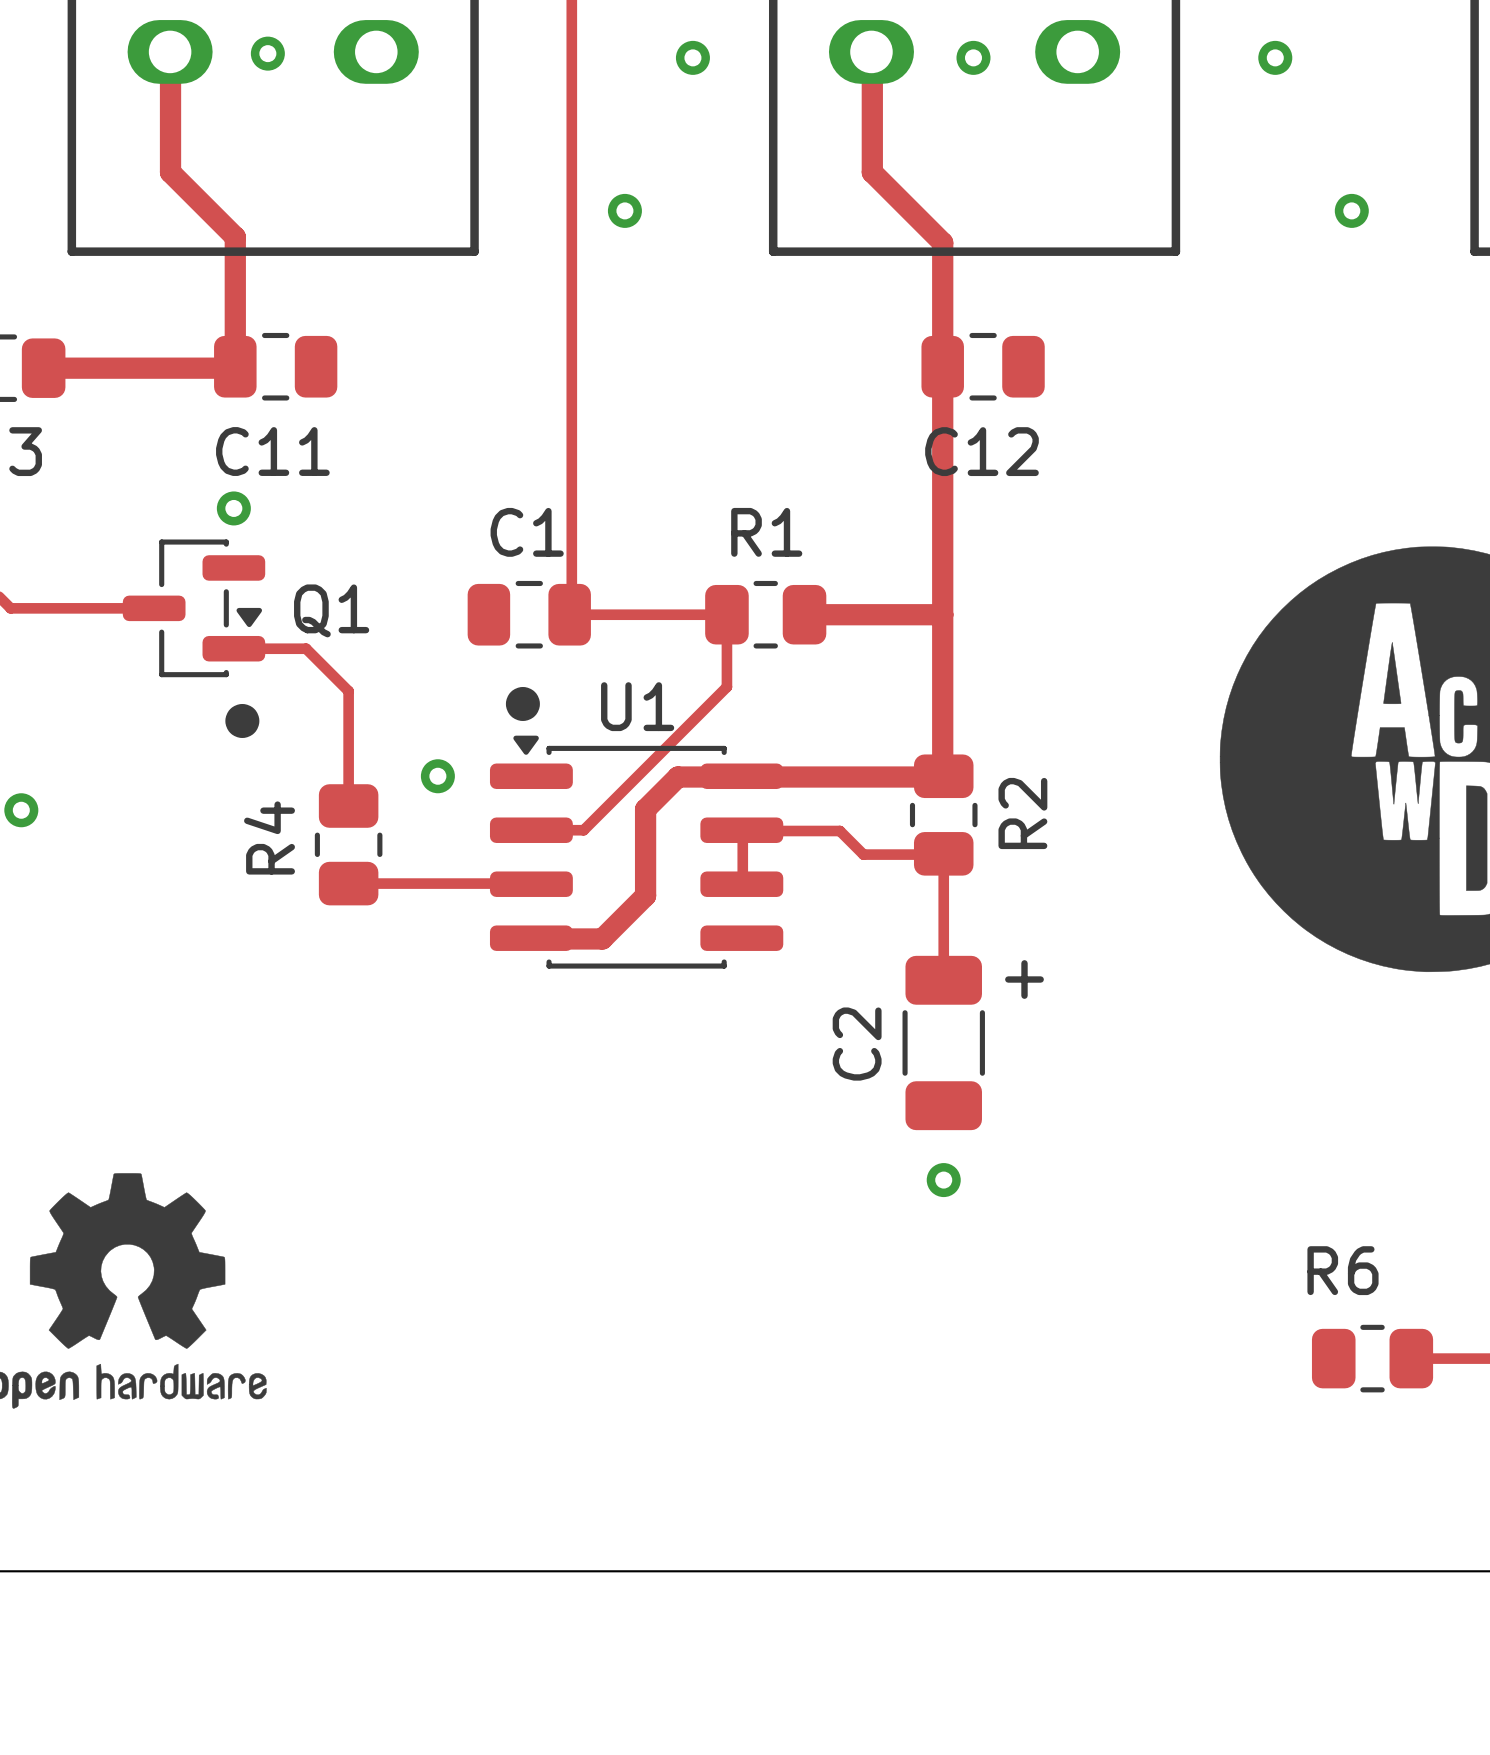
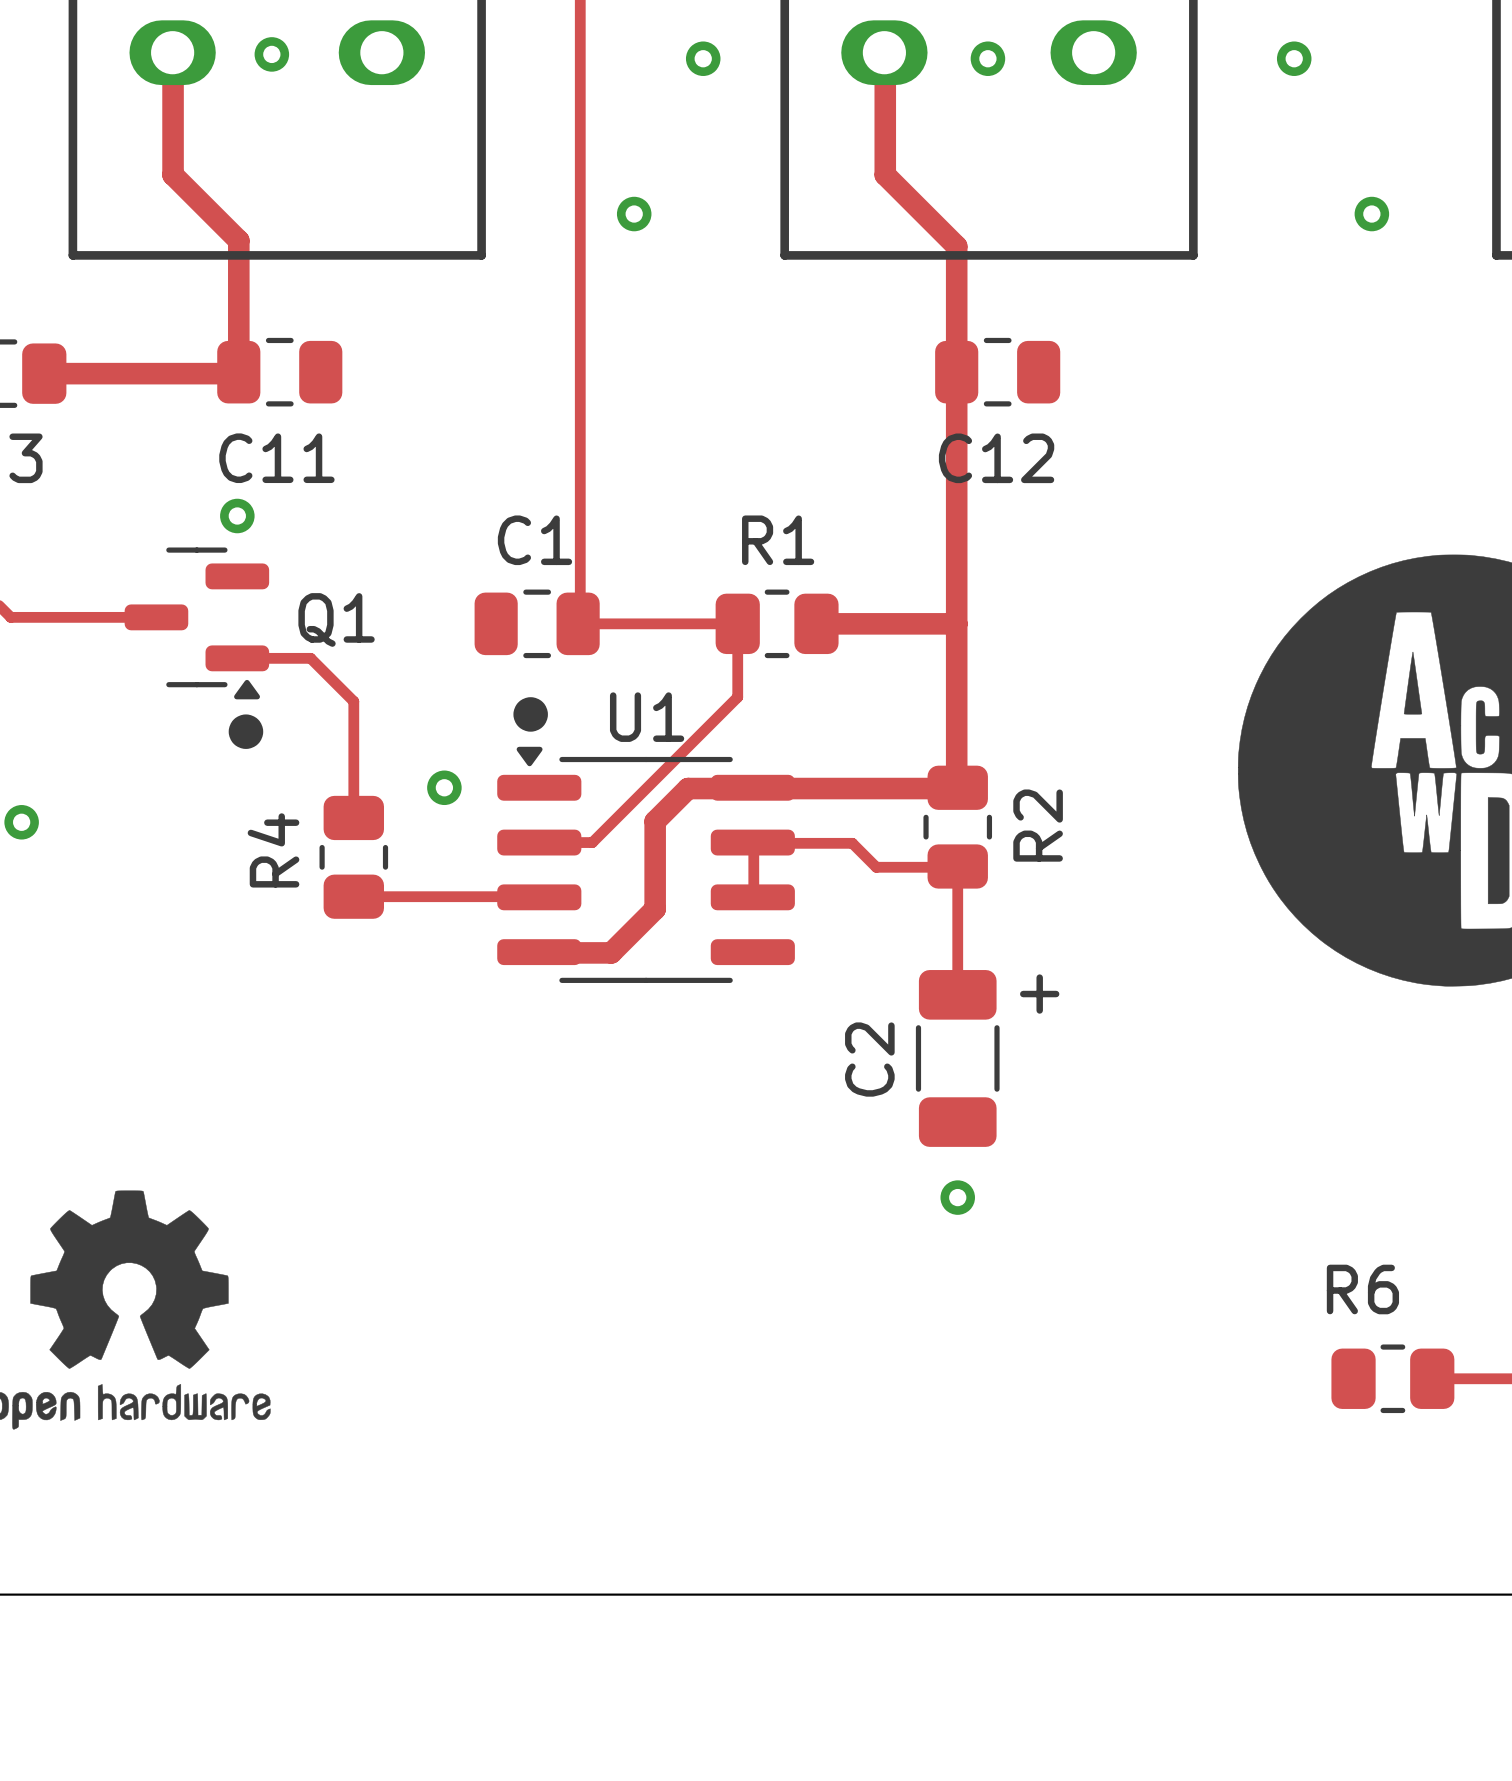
Q1 footprint: [122, 539, 266, 678] -> [124, 547, 270, 700]
U1 footprint: [489, 735, 784, 969] -> [497, 746, 795, 983]

